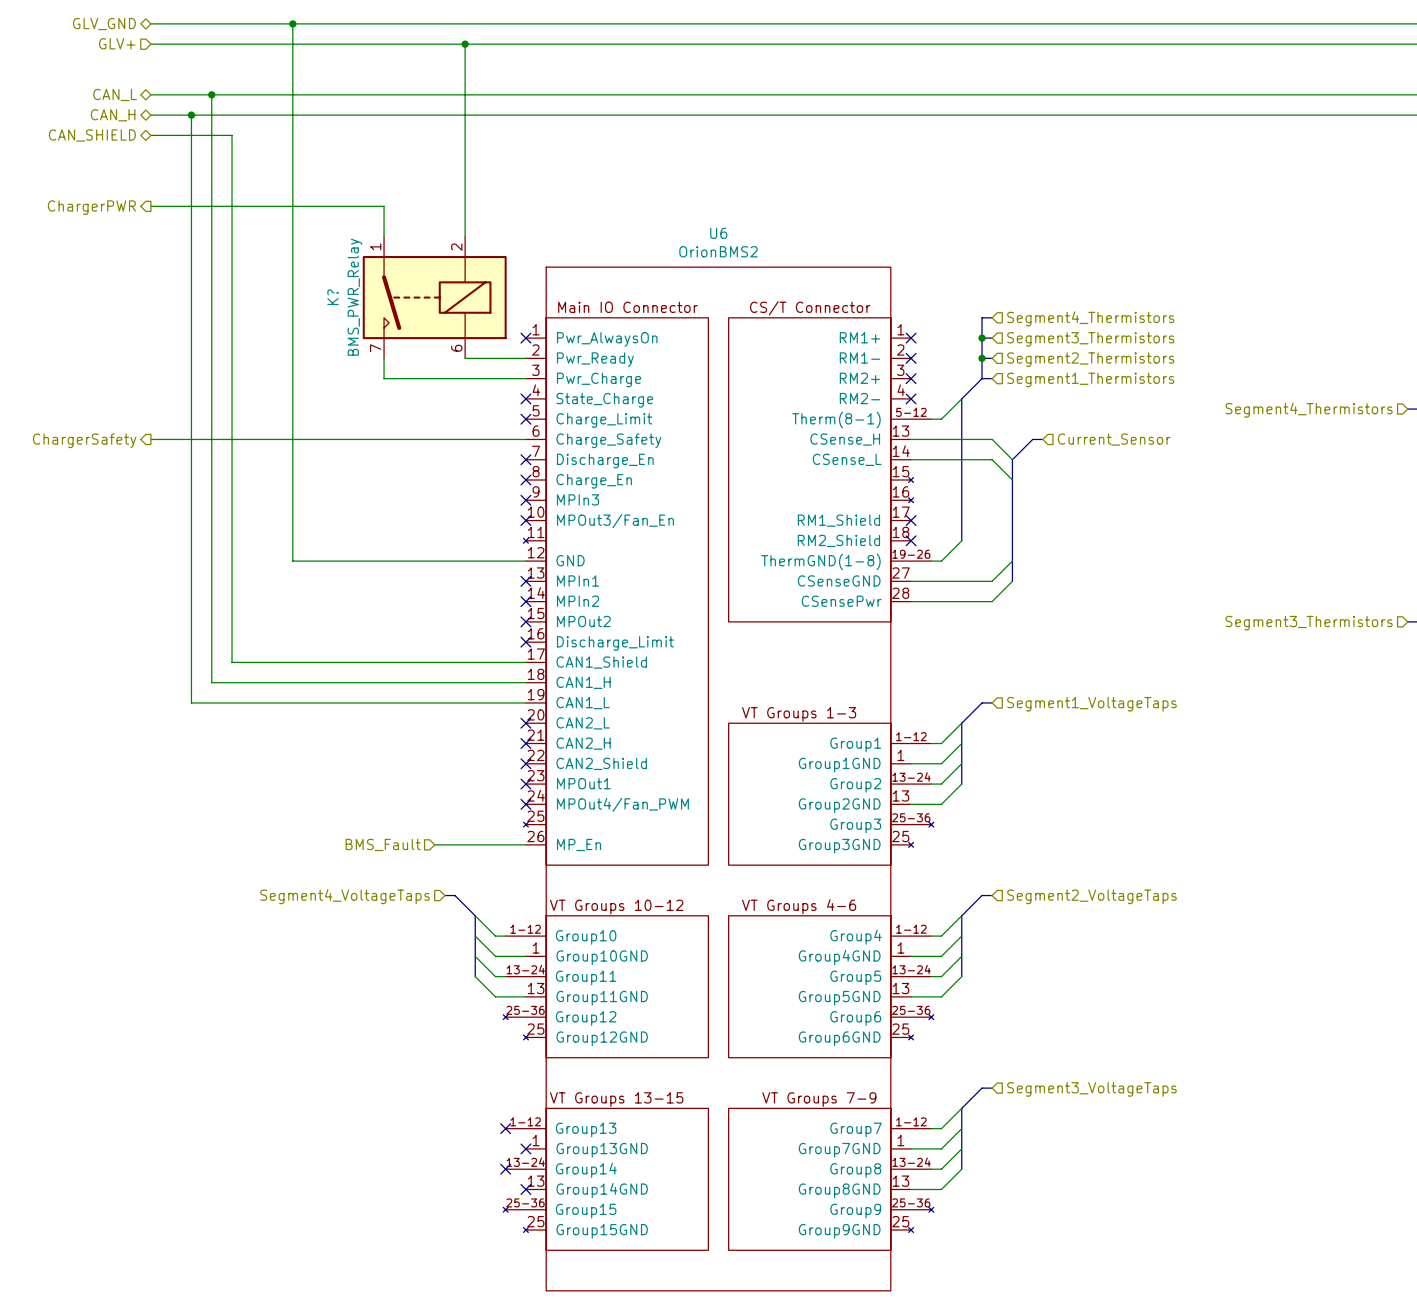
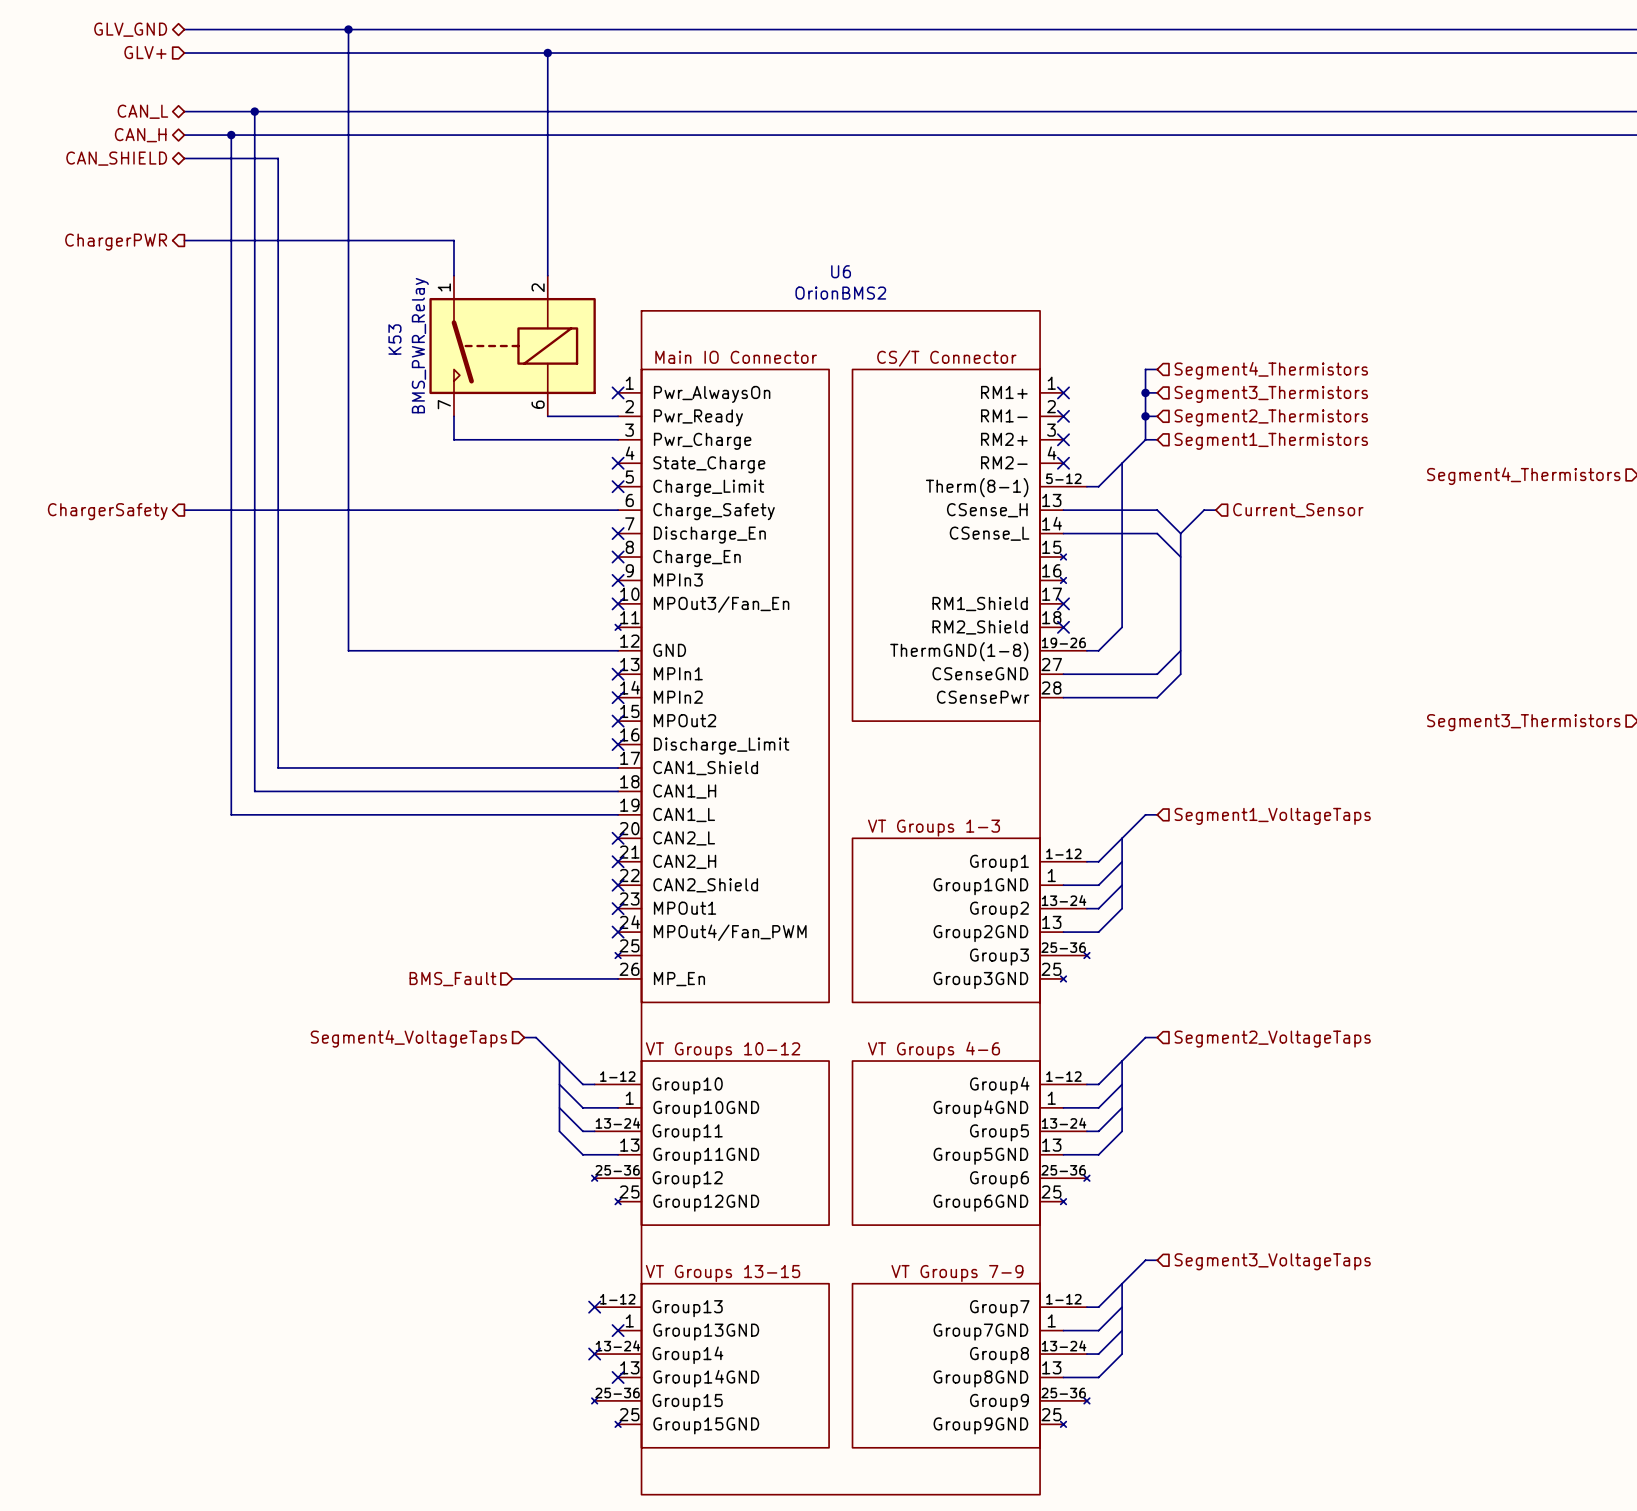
K? name: K? (332, 297) -> K53 (394, 339)

